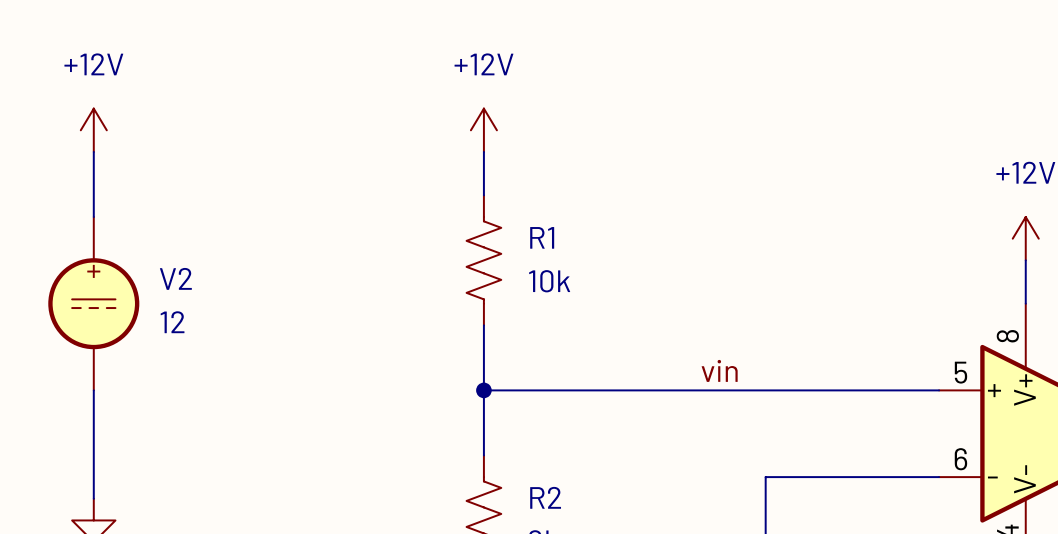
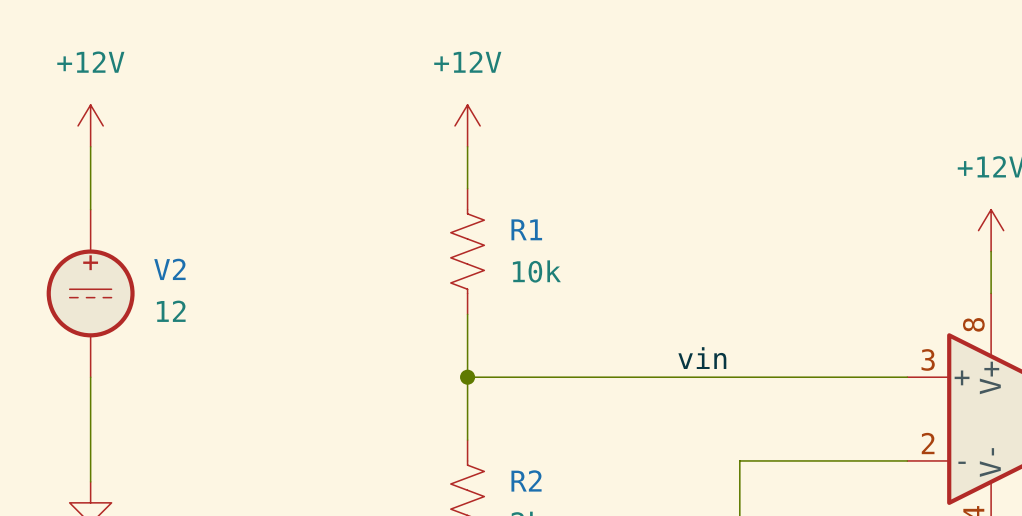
part pin number: 5 (960, 372) -> 3 (928, 359)
part pin number: 6 (960, 459) -> 2 (928, 443)

